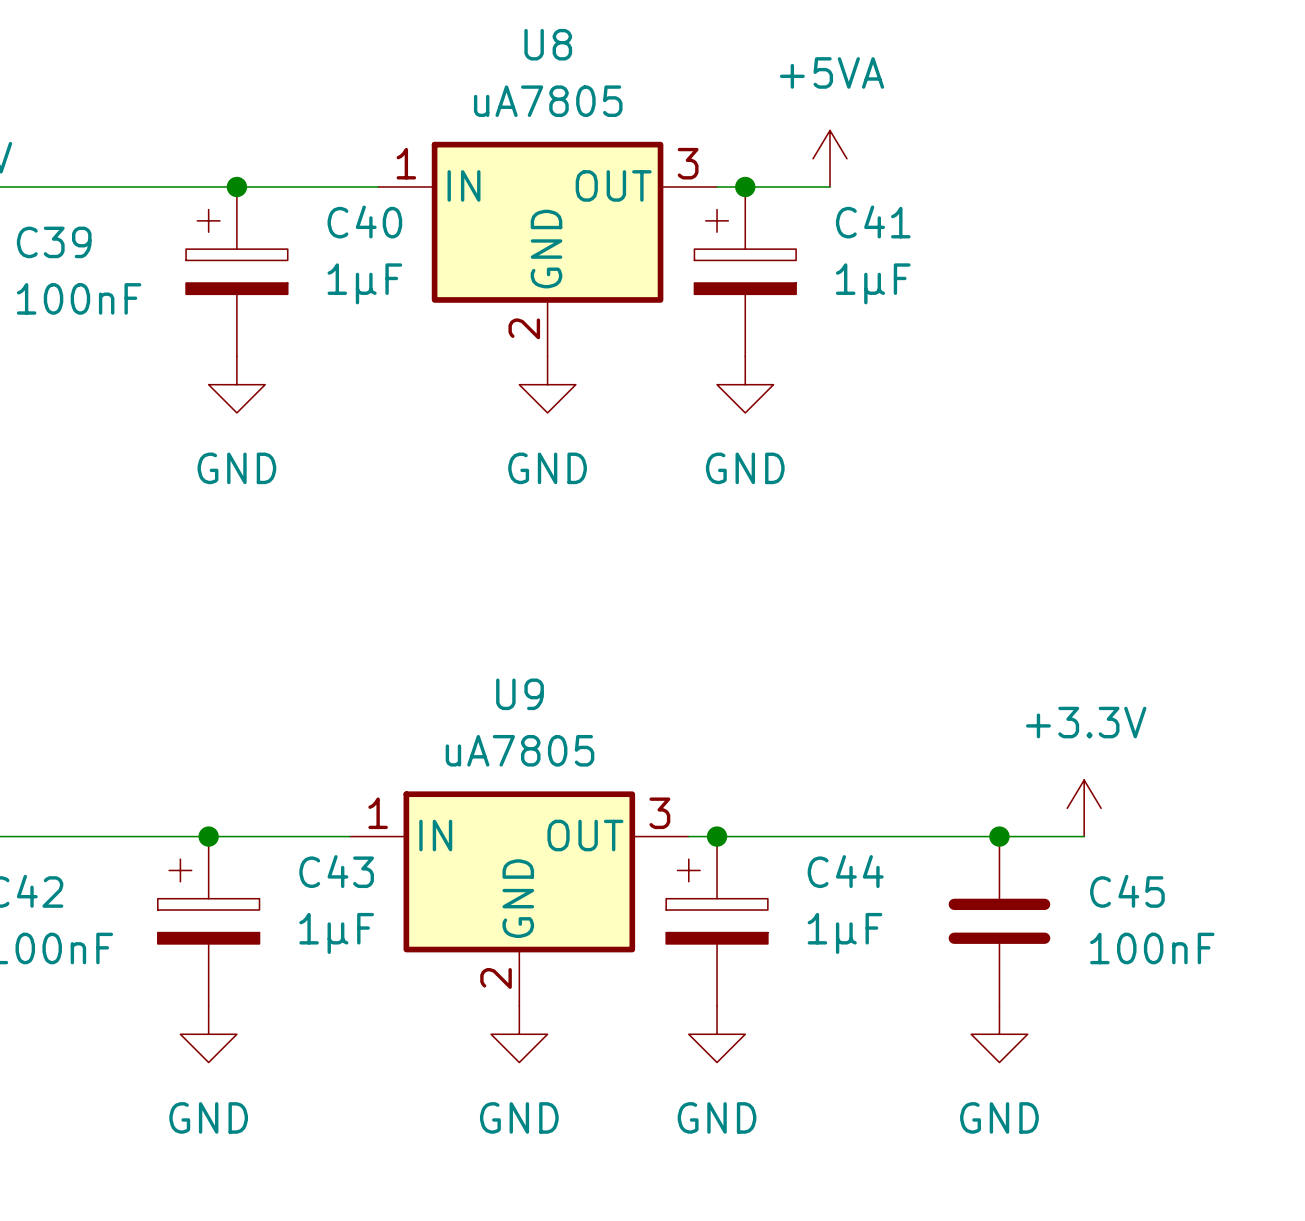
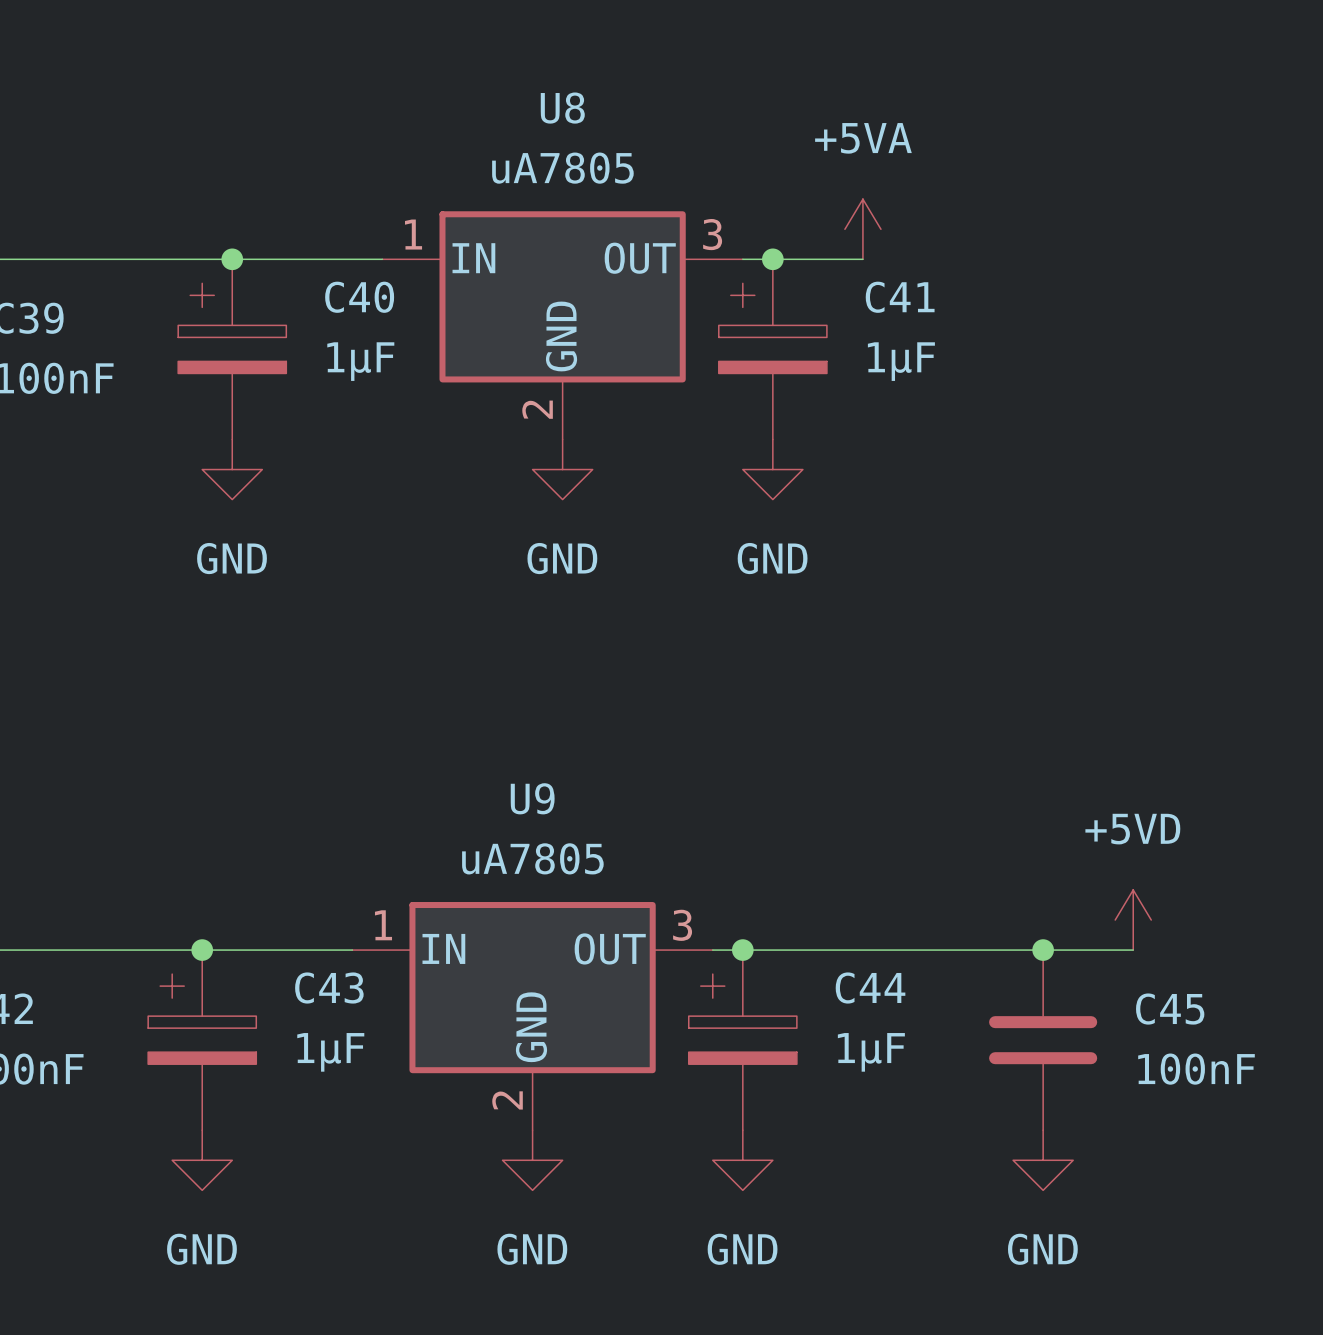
power symbol: +3.3V (1084, 808) -> +5VD (1133, 920)

